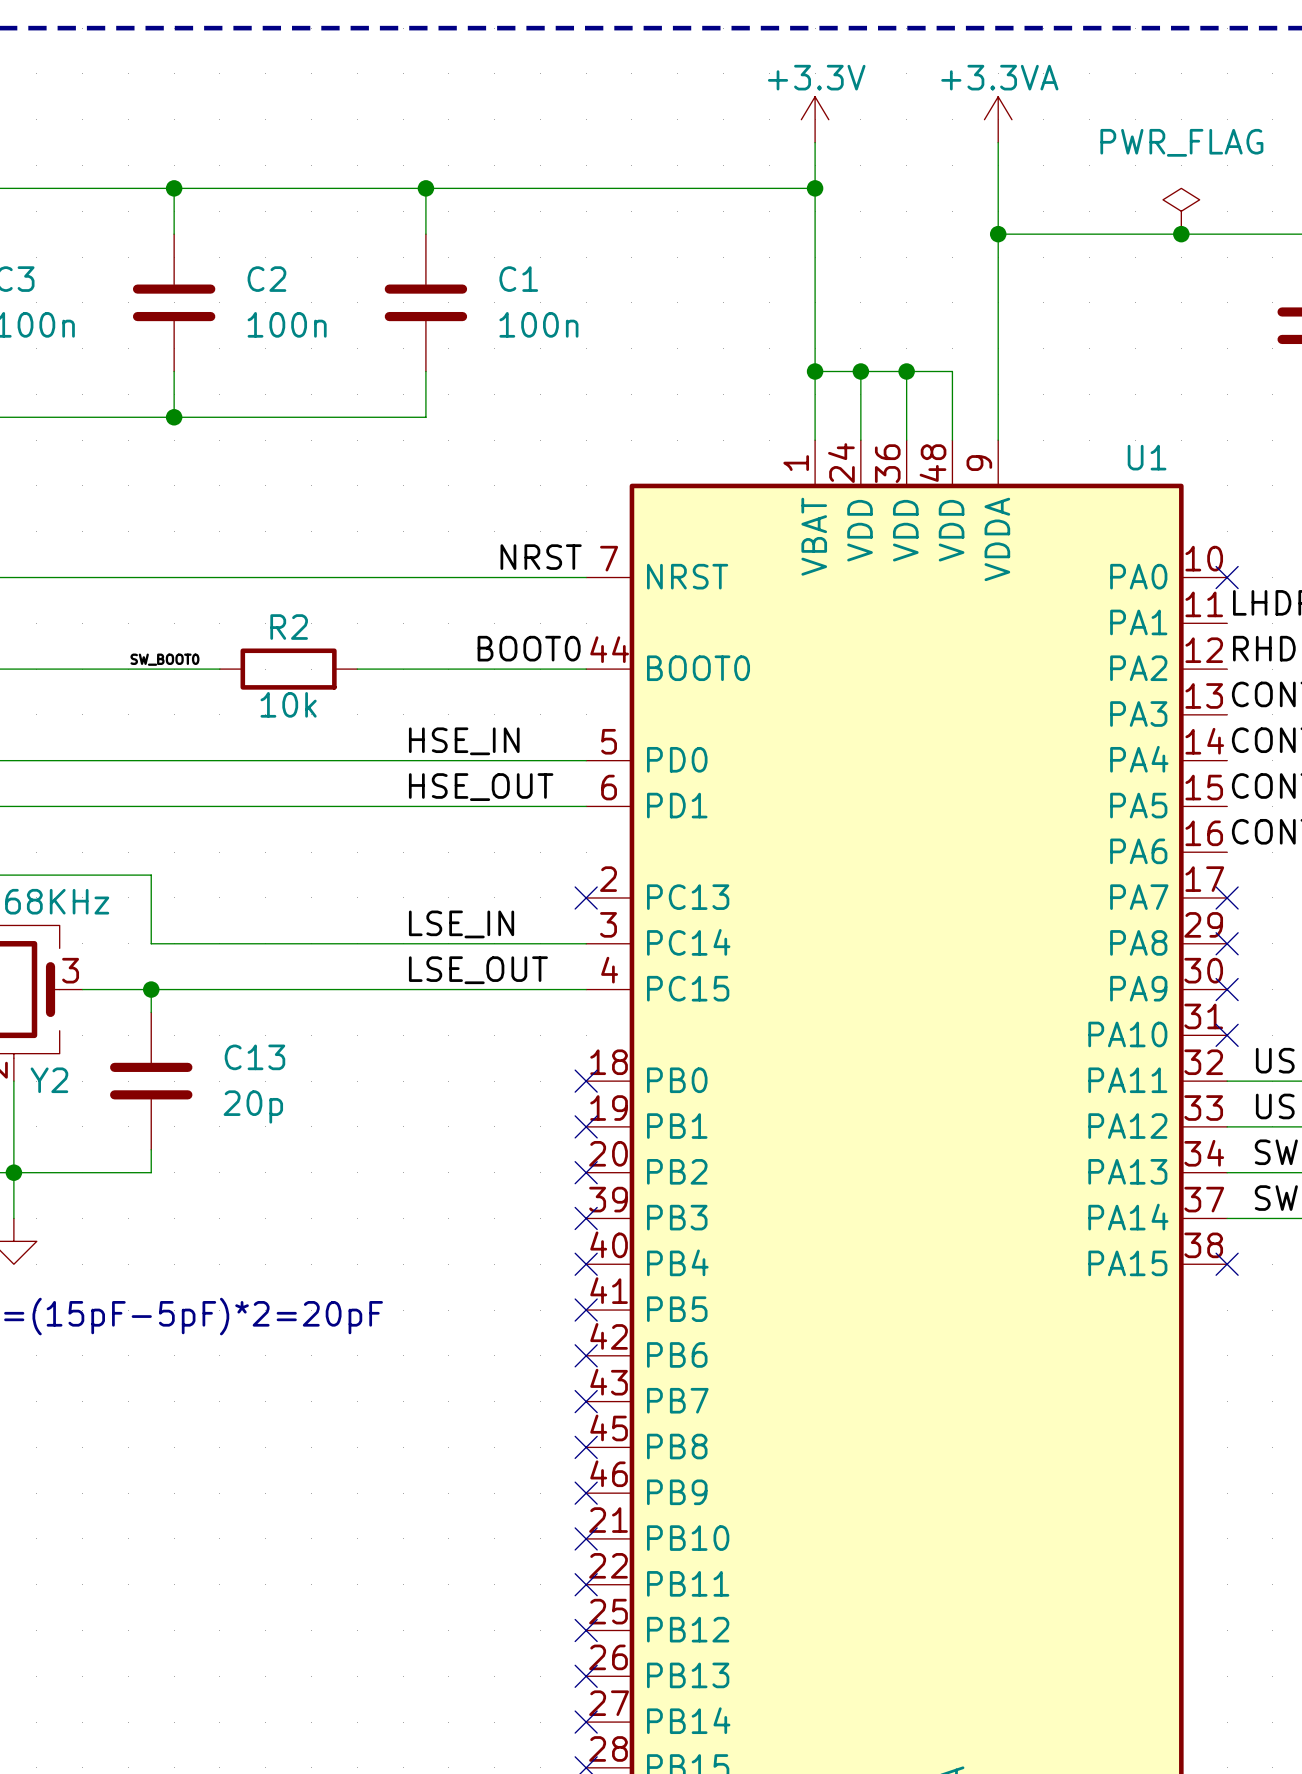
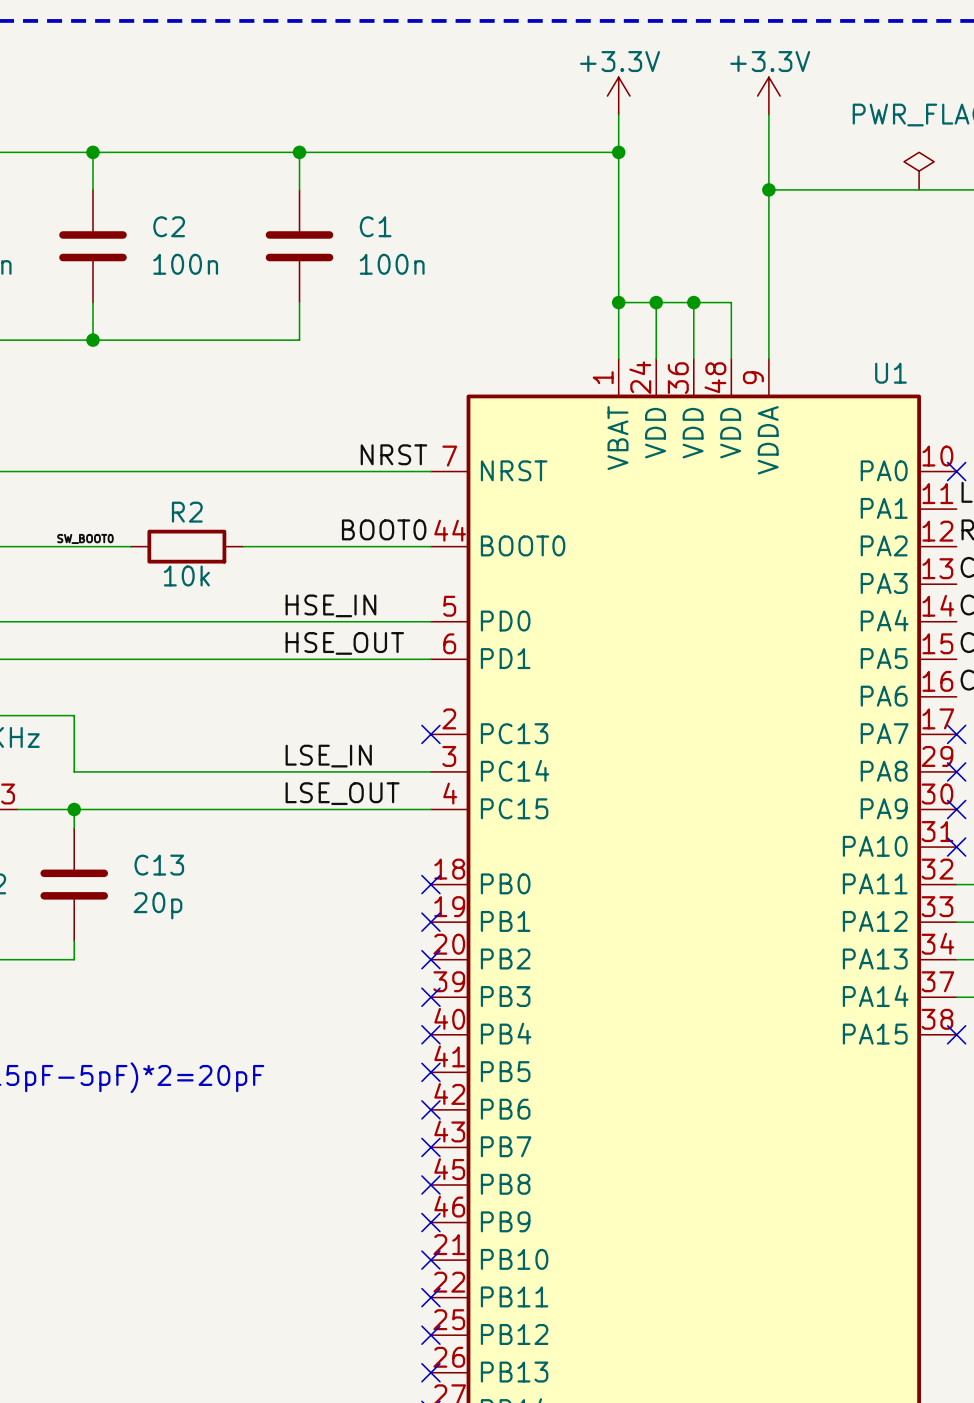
power symbol: +3.3VA (998, 119) -> +3.3V (768, 96)
junction: (1181, 234) -> none

